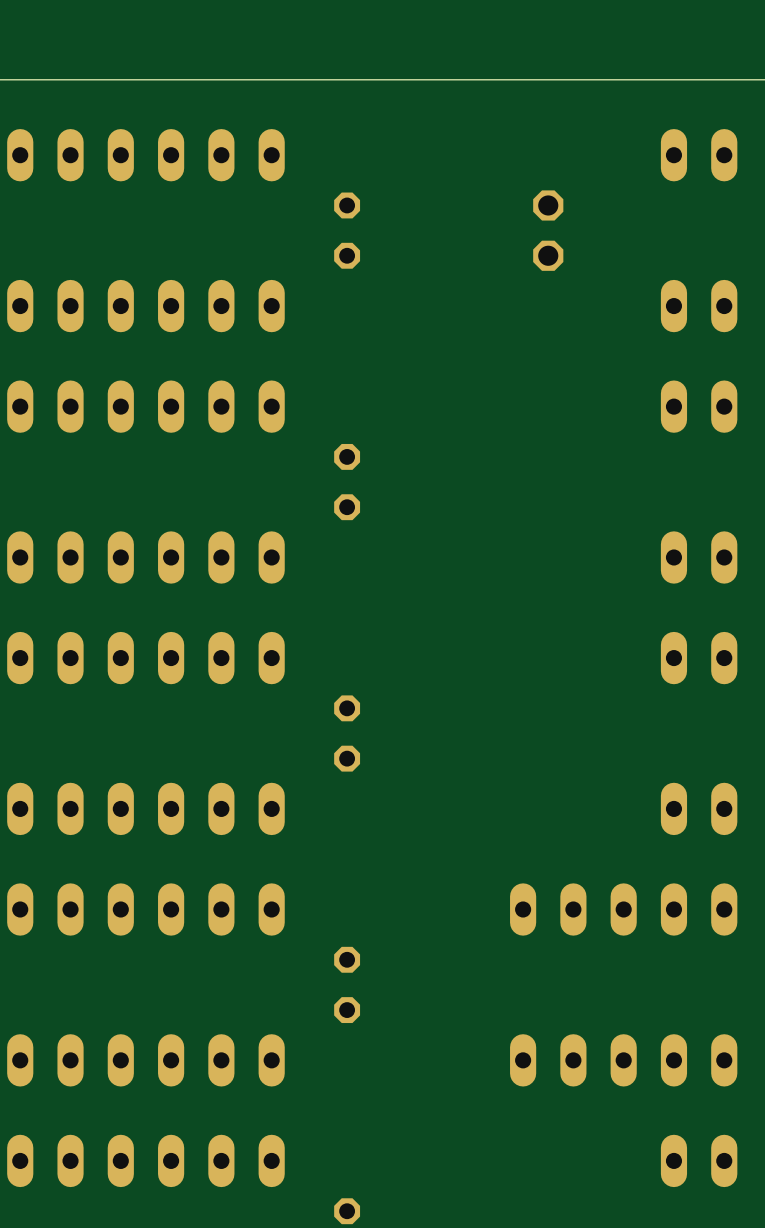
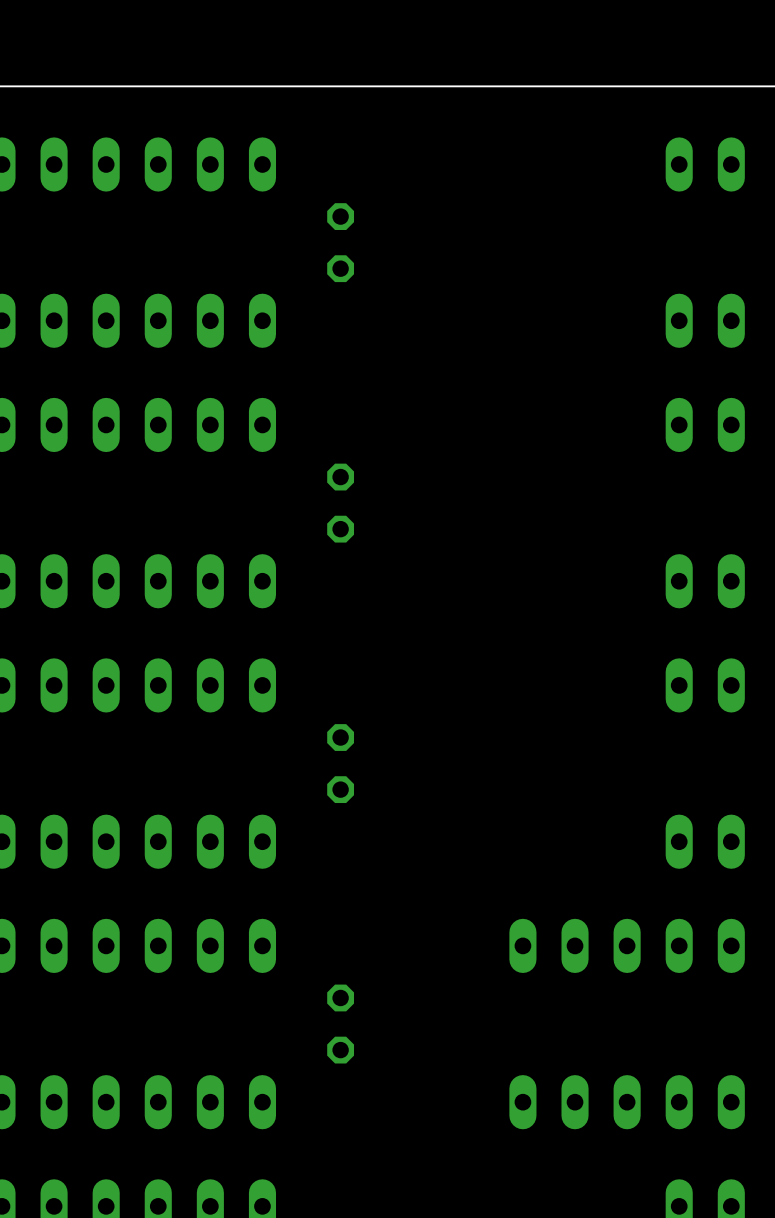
part: (548, 230) -> none

